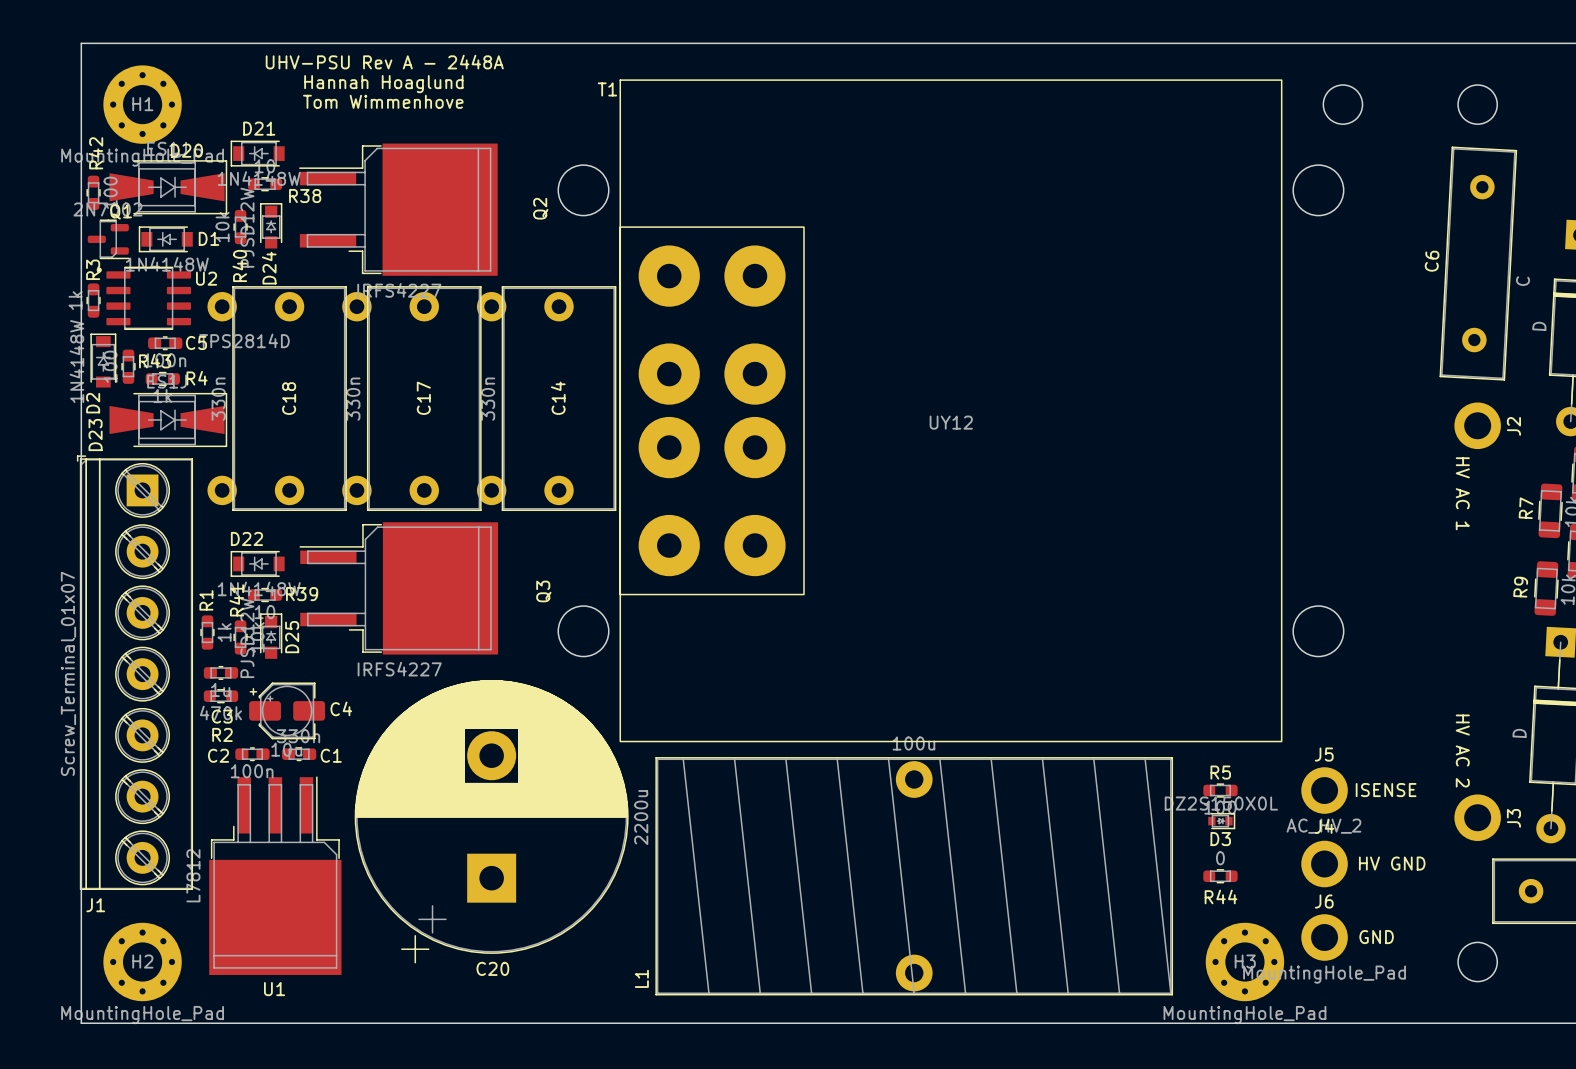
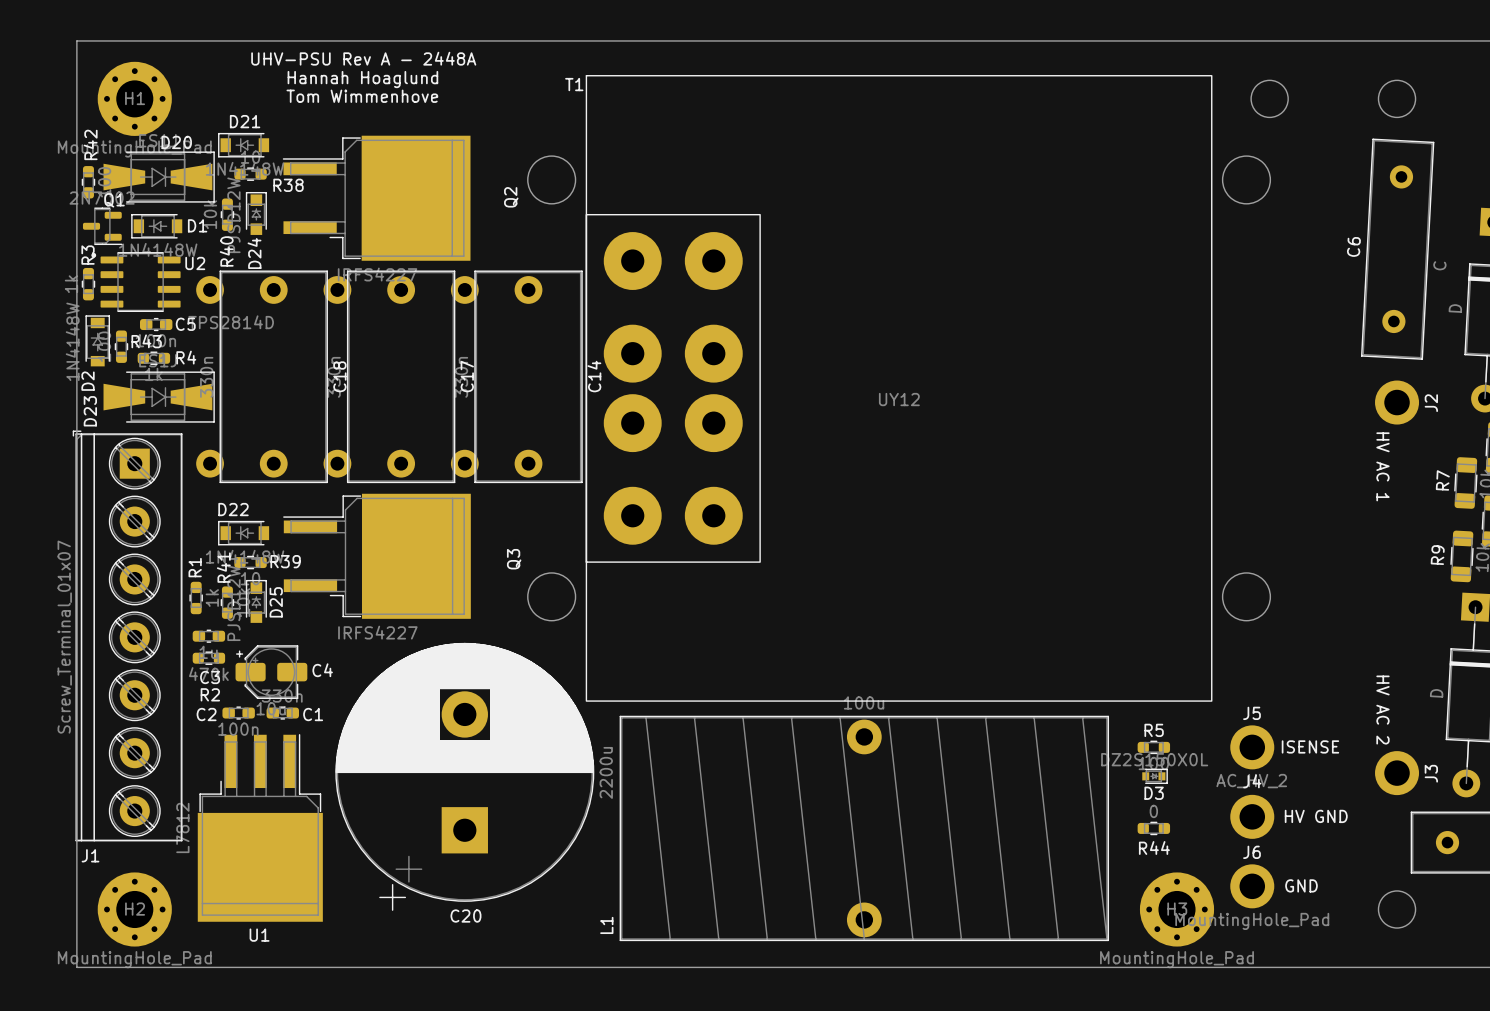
C18 name position: C18 (289, 398) -> C18 (339, 376)
C17 name position: C17 (423, 398) -> C17 (467, 376)
C14 name position: C14 (558, 398) -> C14 (594, 376)

